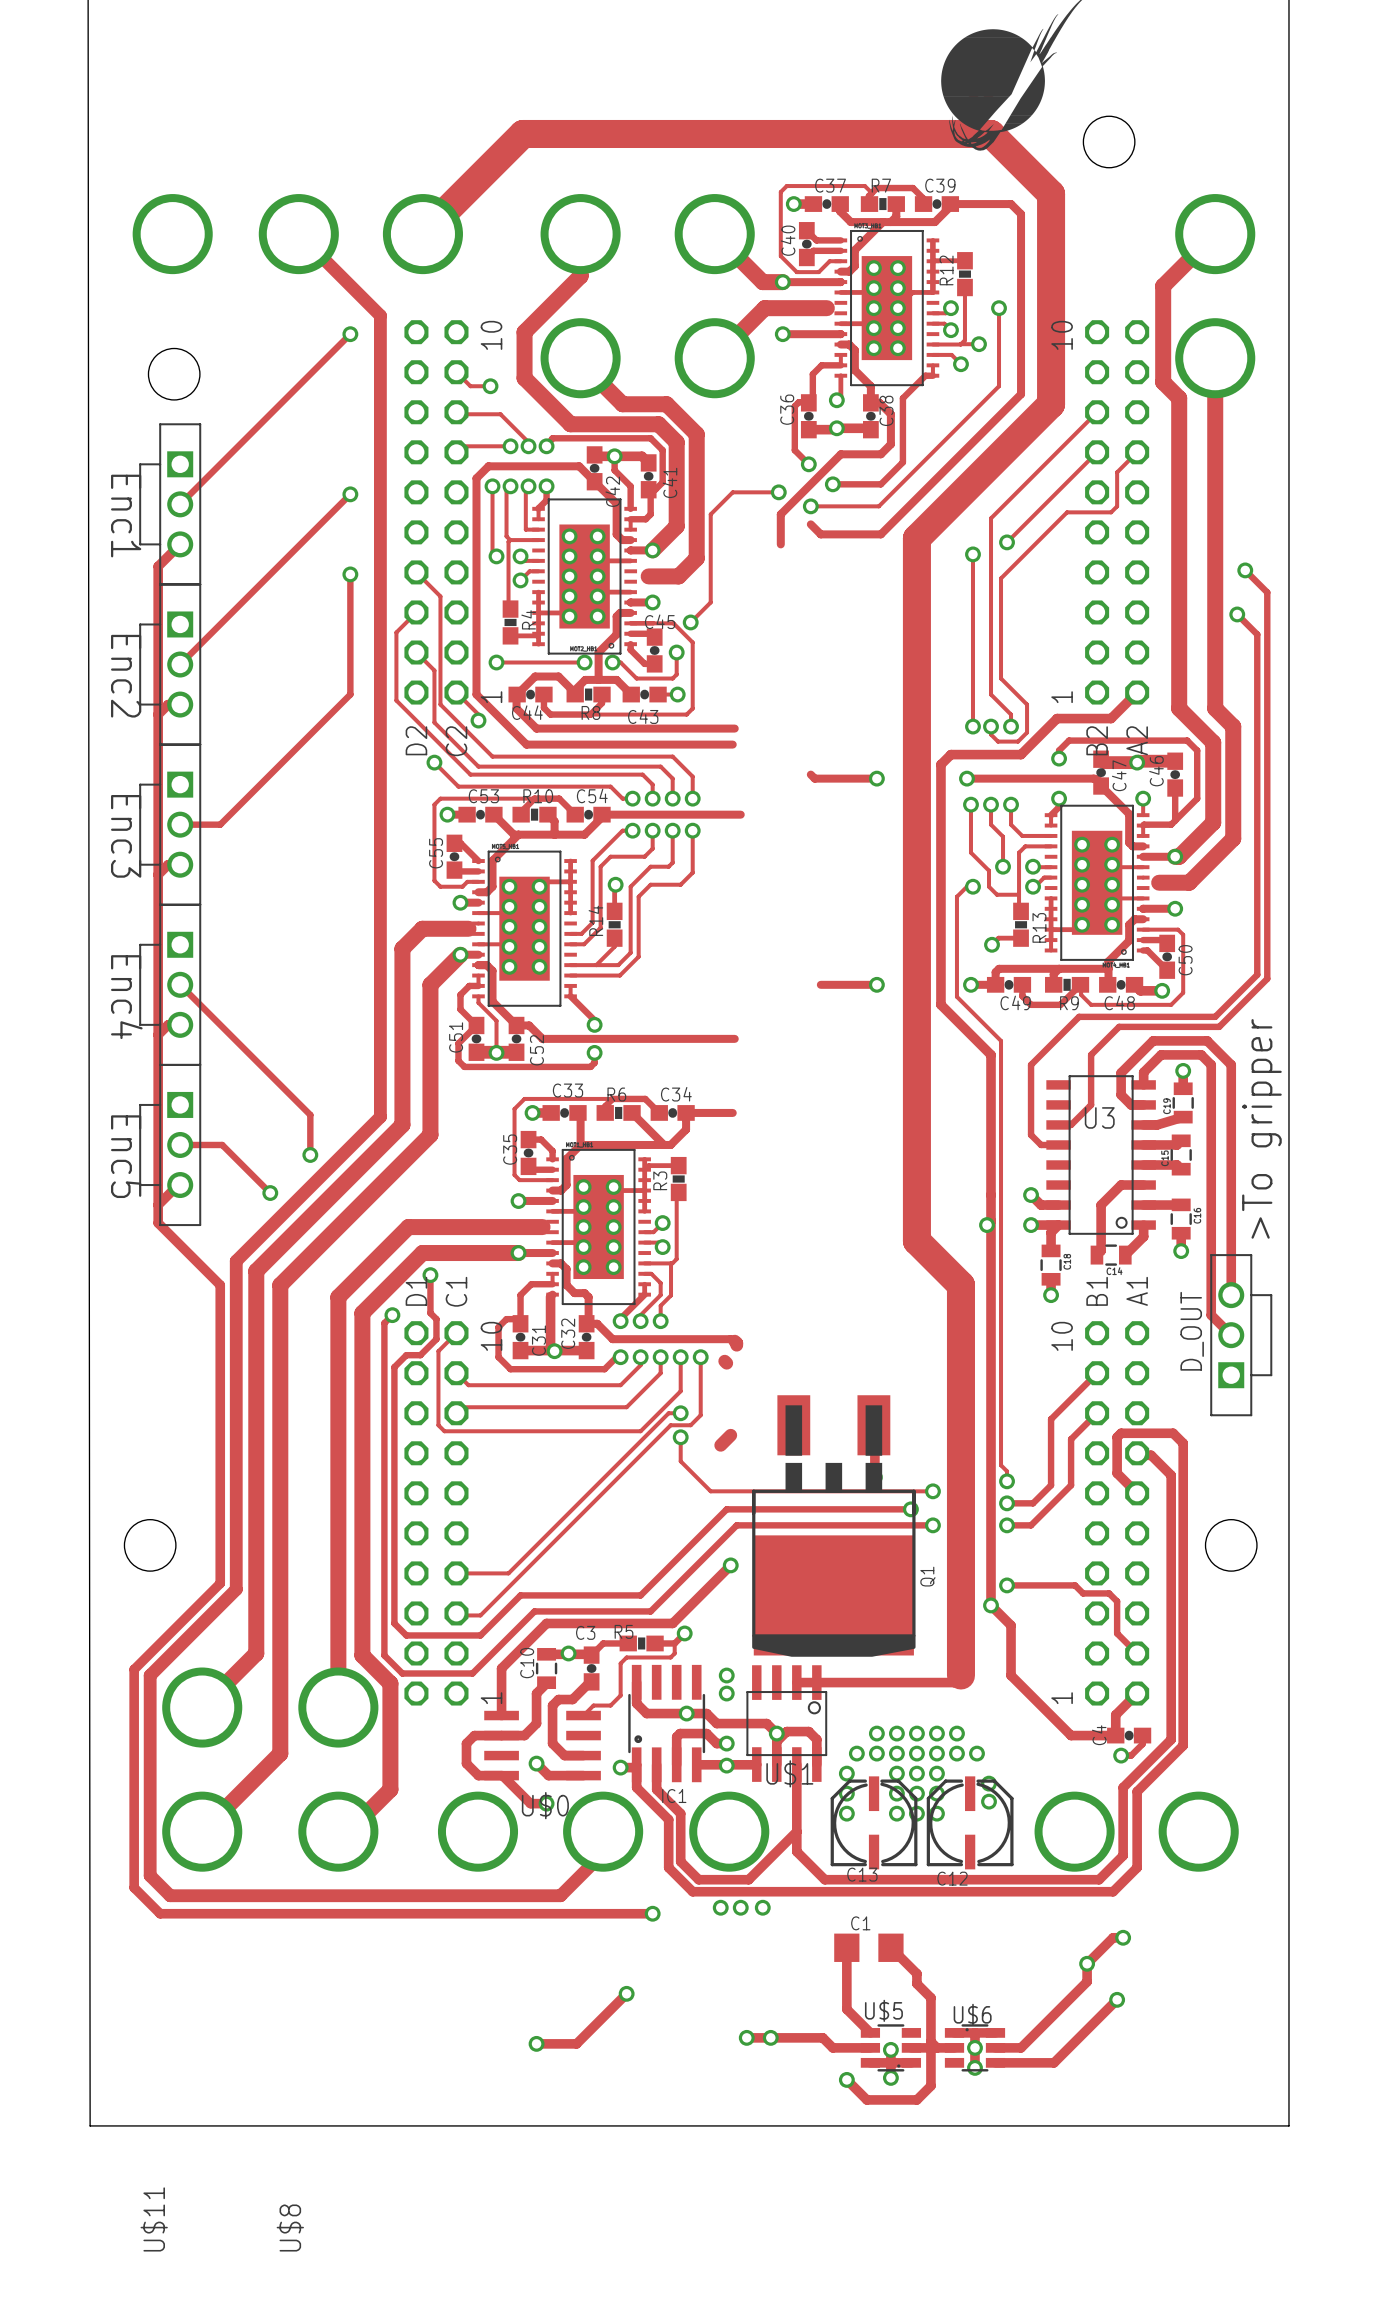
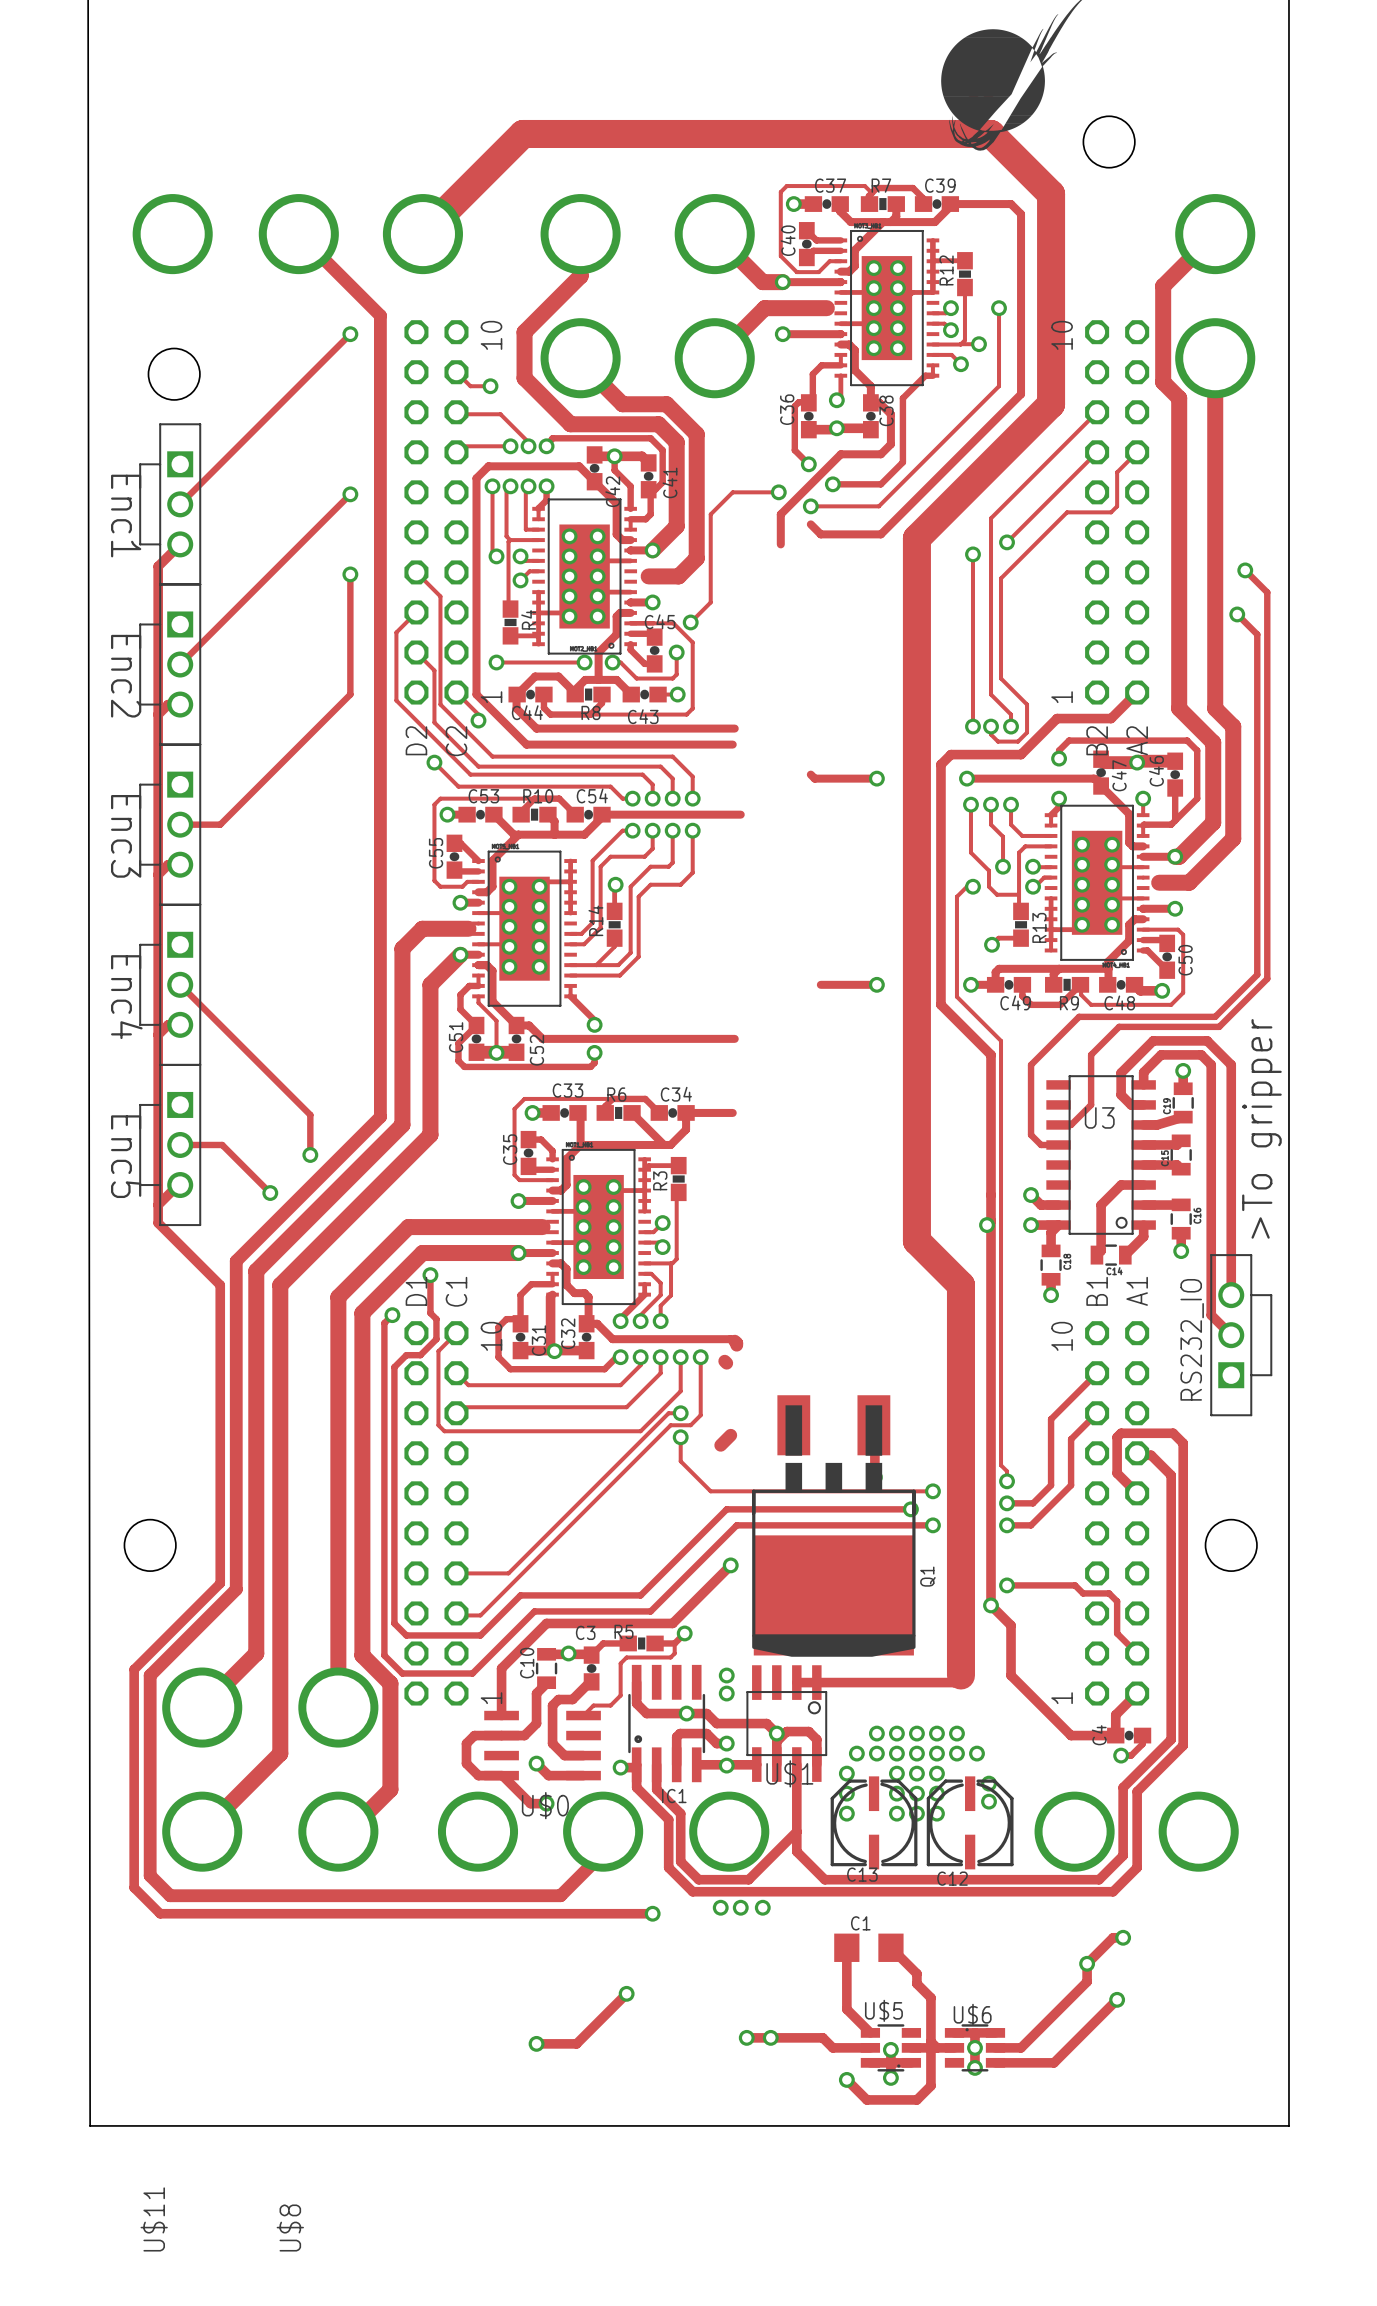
D_OUT name: D_OUT (1192, 1331) -> RS232_IO (1192, 1339)

